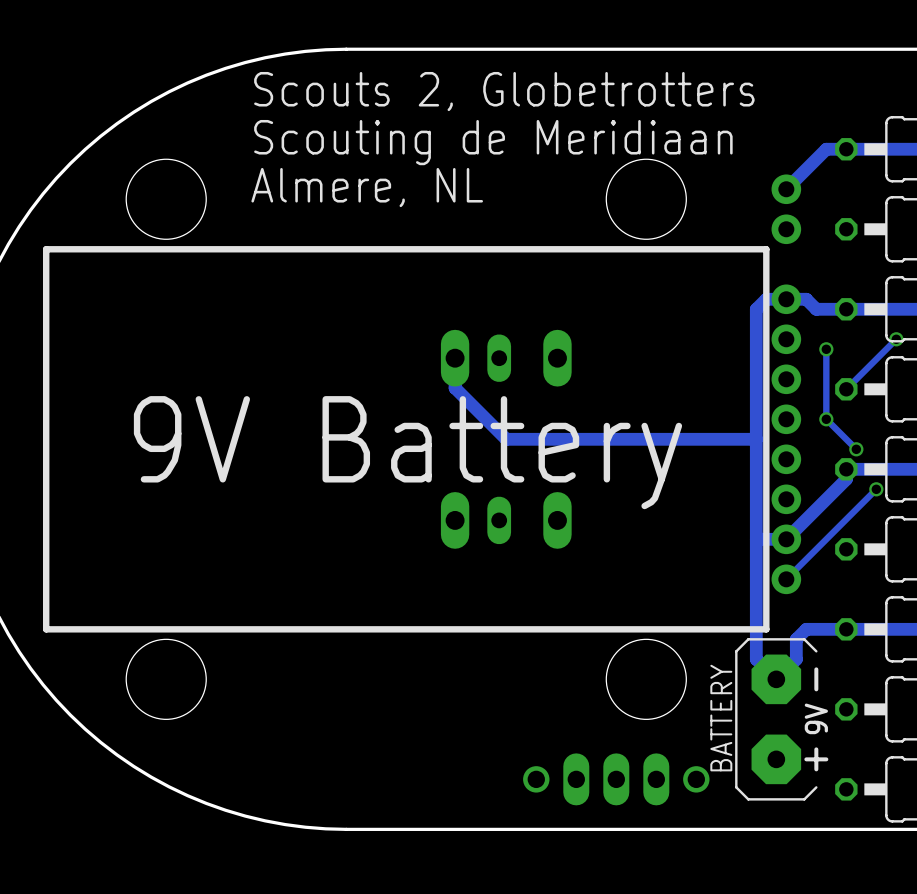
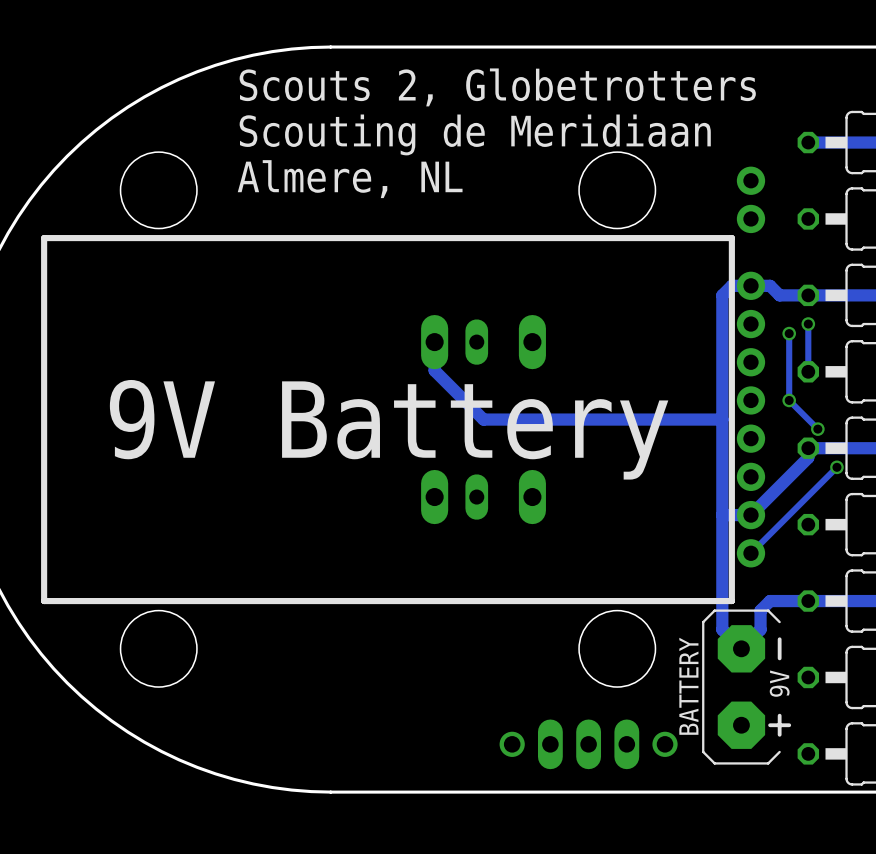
track: (846, 149) (826, 149) (786, 189) -> none
track: (896, 339) (846, 389) -> (808, 324) (808, 371)
via position: (896, 339) -> (808, 324)

